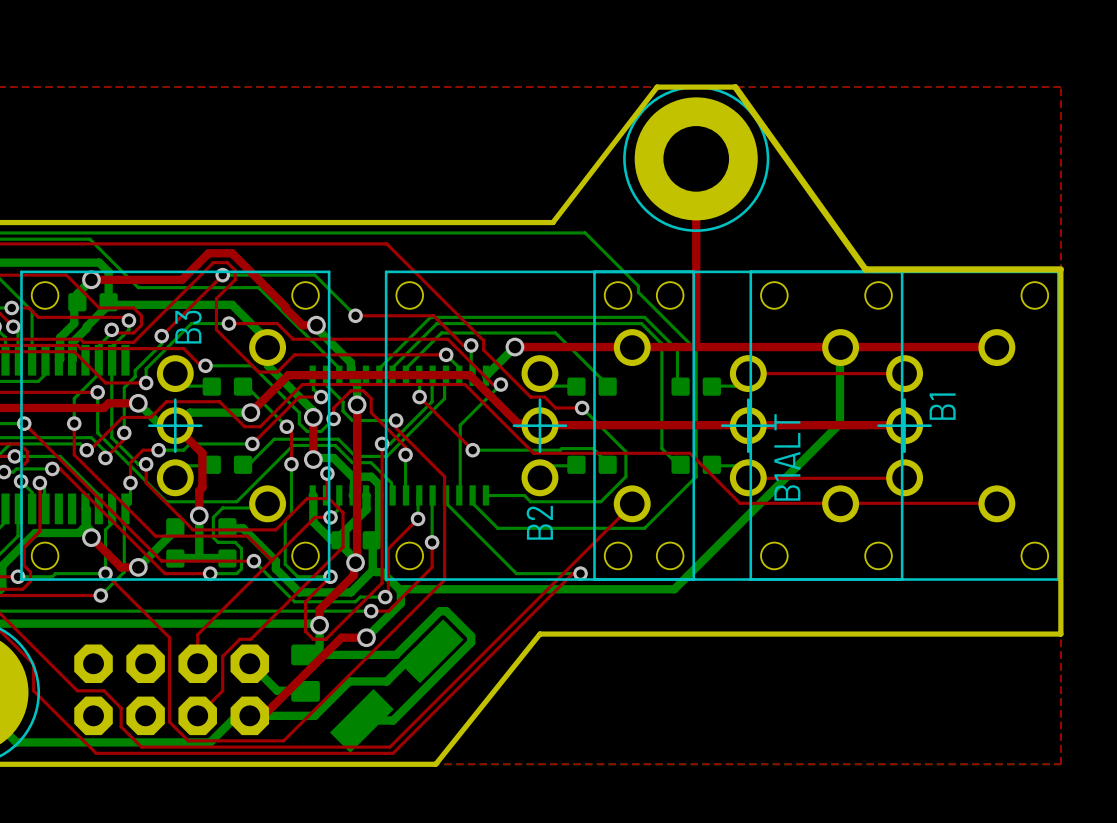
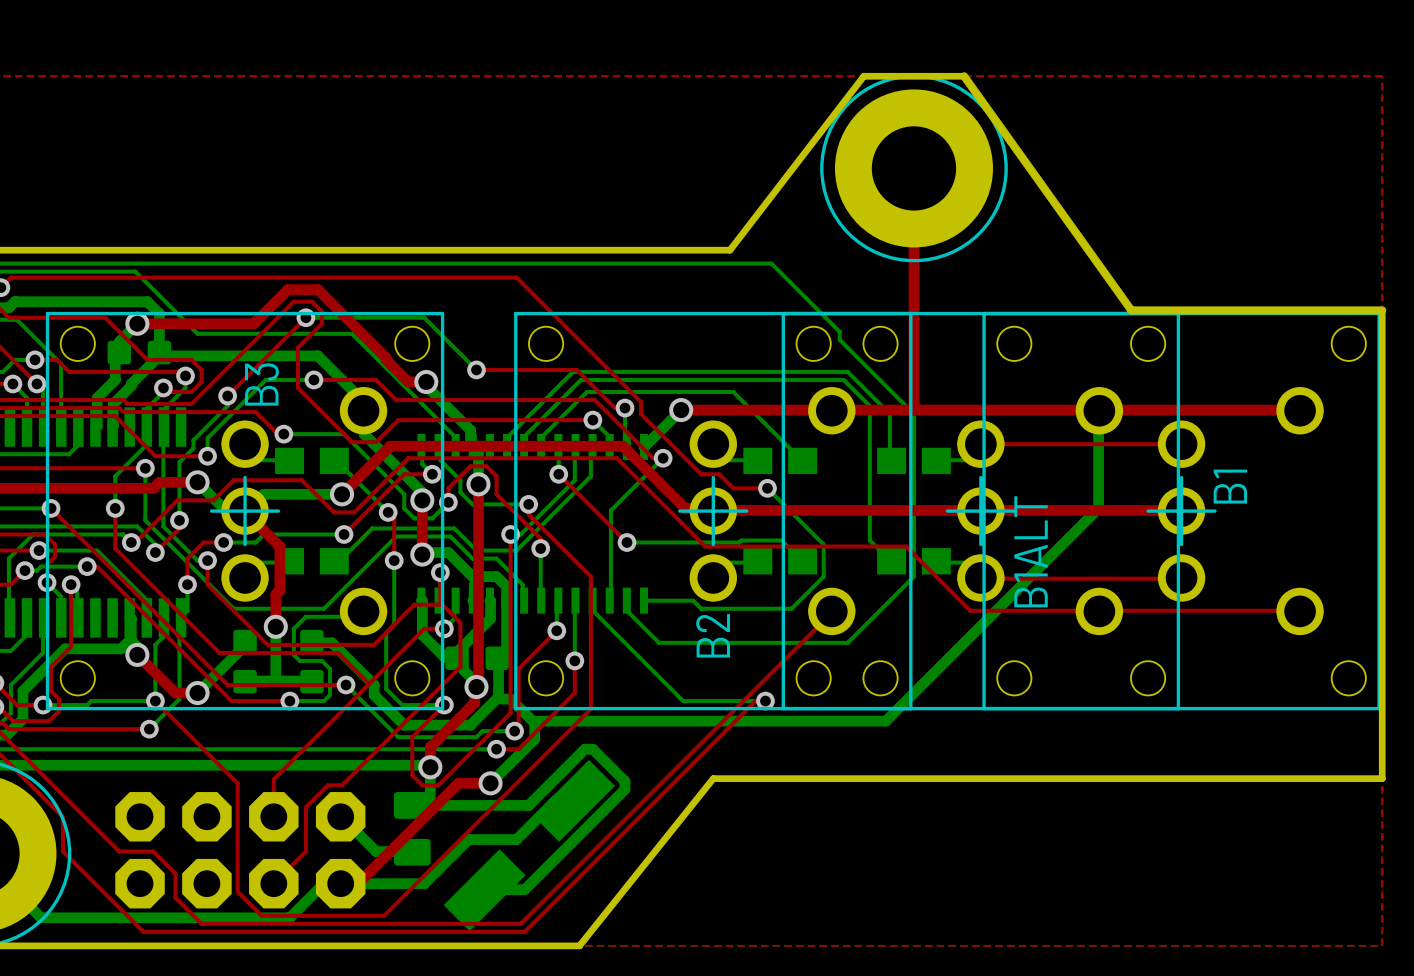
part footprint: [202, 377, 253, 396] -> [275, 447, 349, 475]
part footprint: [567, 377, 617, 396] -> [743, 447, 818, 475]
part footprint: [671, 377, 721, 396] -> [877, 447, 951, 475]
part footprint: [202, 455, 253, 474] -> [275, 548, 349, 575]
part footprint: [567, 455, 617, 474] -> [743, 548, 818, 575]
part footprint: [671, 455, 721, 474] -> [877, 548, 951, 575]

